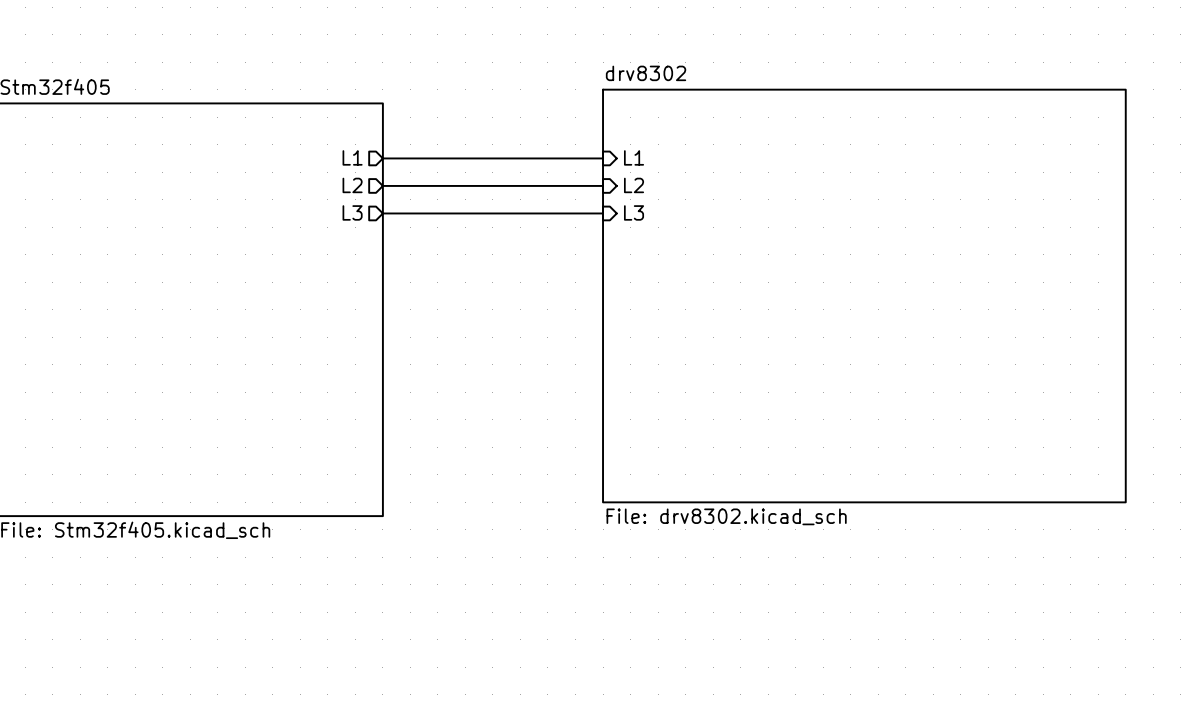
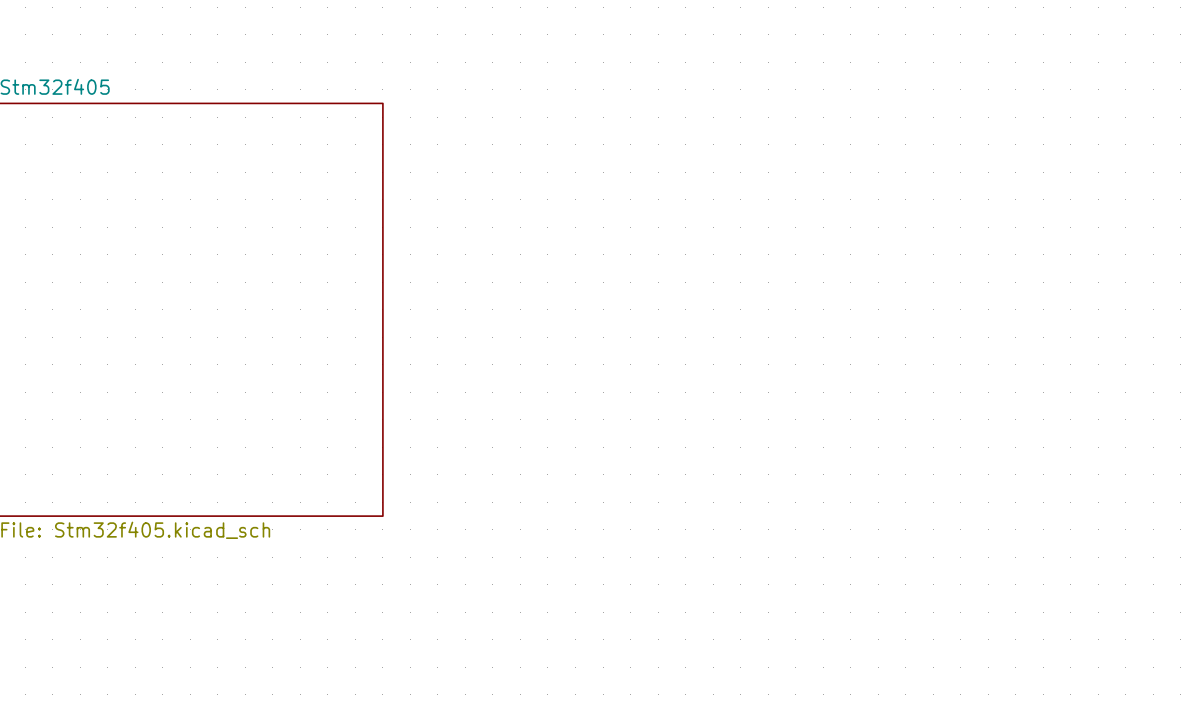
sheet pin: L1 (352, 157) -> none
sheet pin: L1 (634, 157) -> none
wire: (382, 158) (603, 158) -> none
sheet pin: L2 (352, 185) -> none
wire: (382, 185) (603, 185) -> none
sheet pin: L2 (634, 185) -> none
sheet pin: L3 (352, 212) -> none
sheet pin: L3 (634, 212) -> none
wire: (382, 213) (603, 213) -> none
sheet drv8302: File: drv8302.kicad_sch (864, 296) -> none

